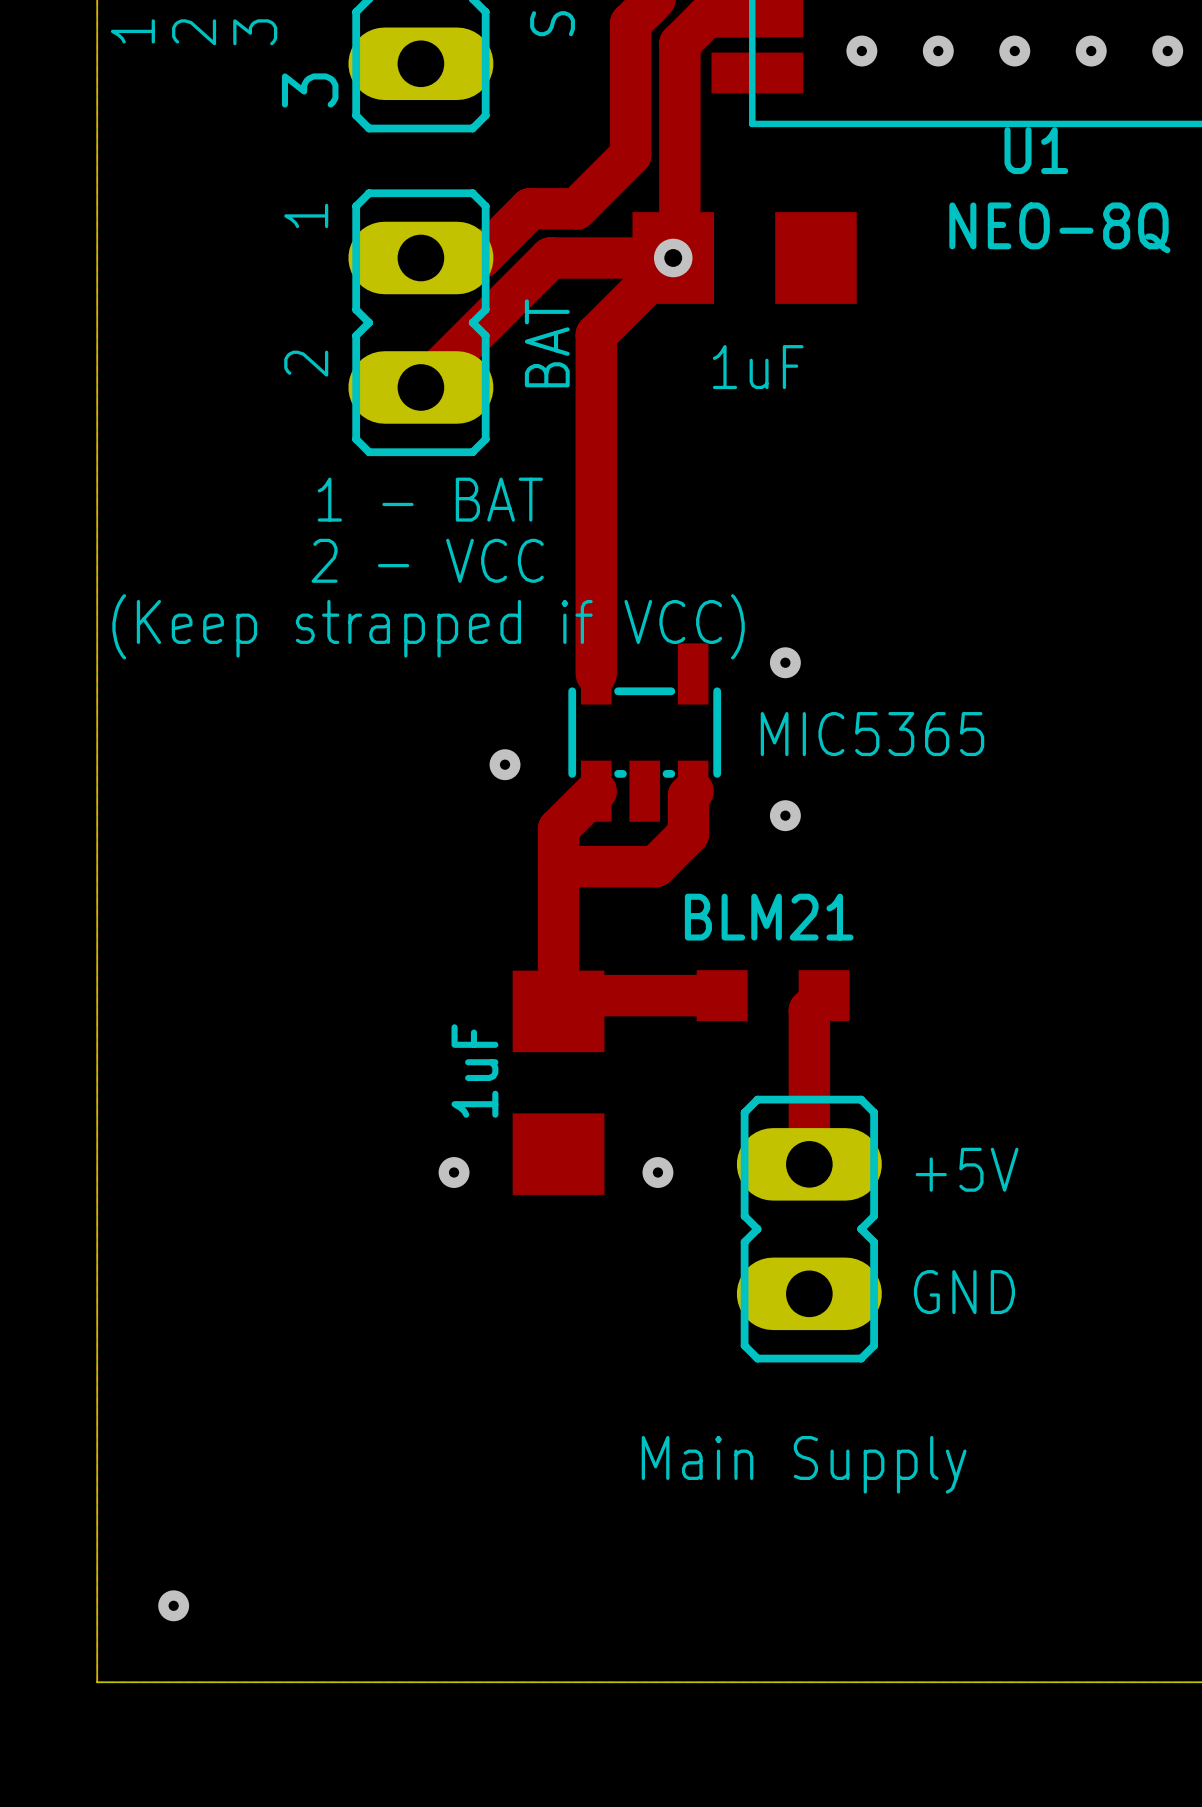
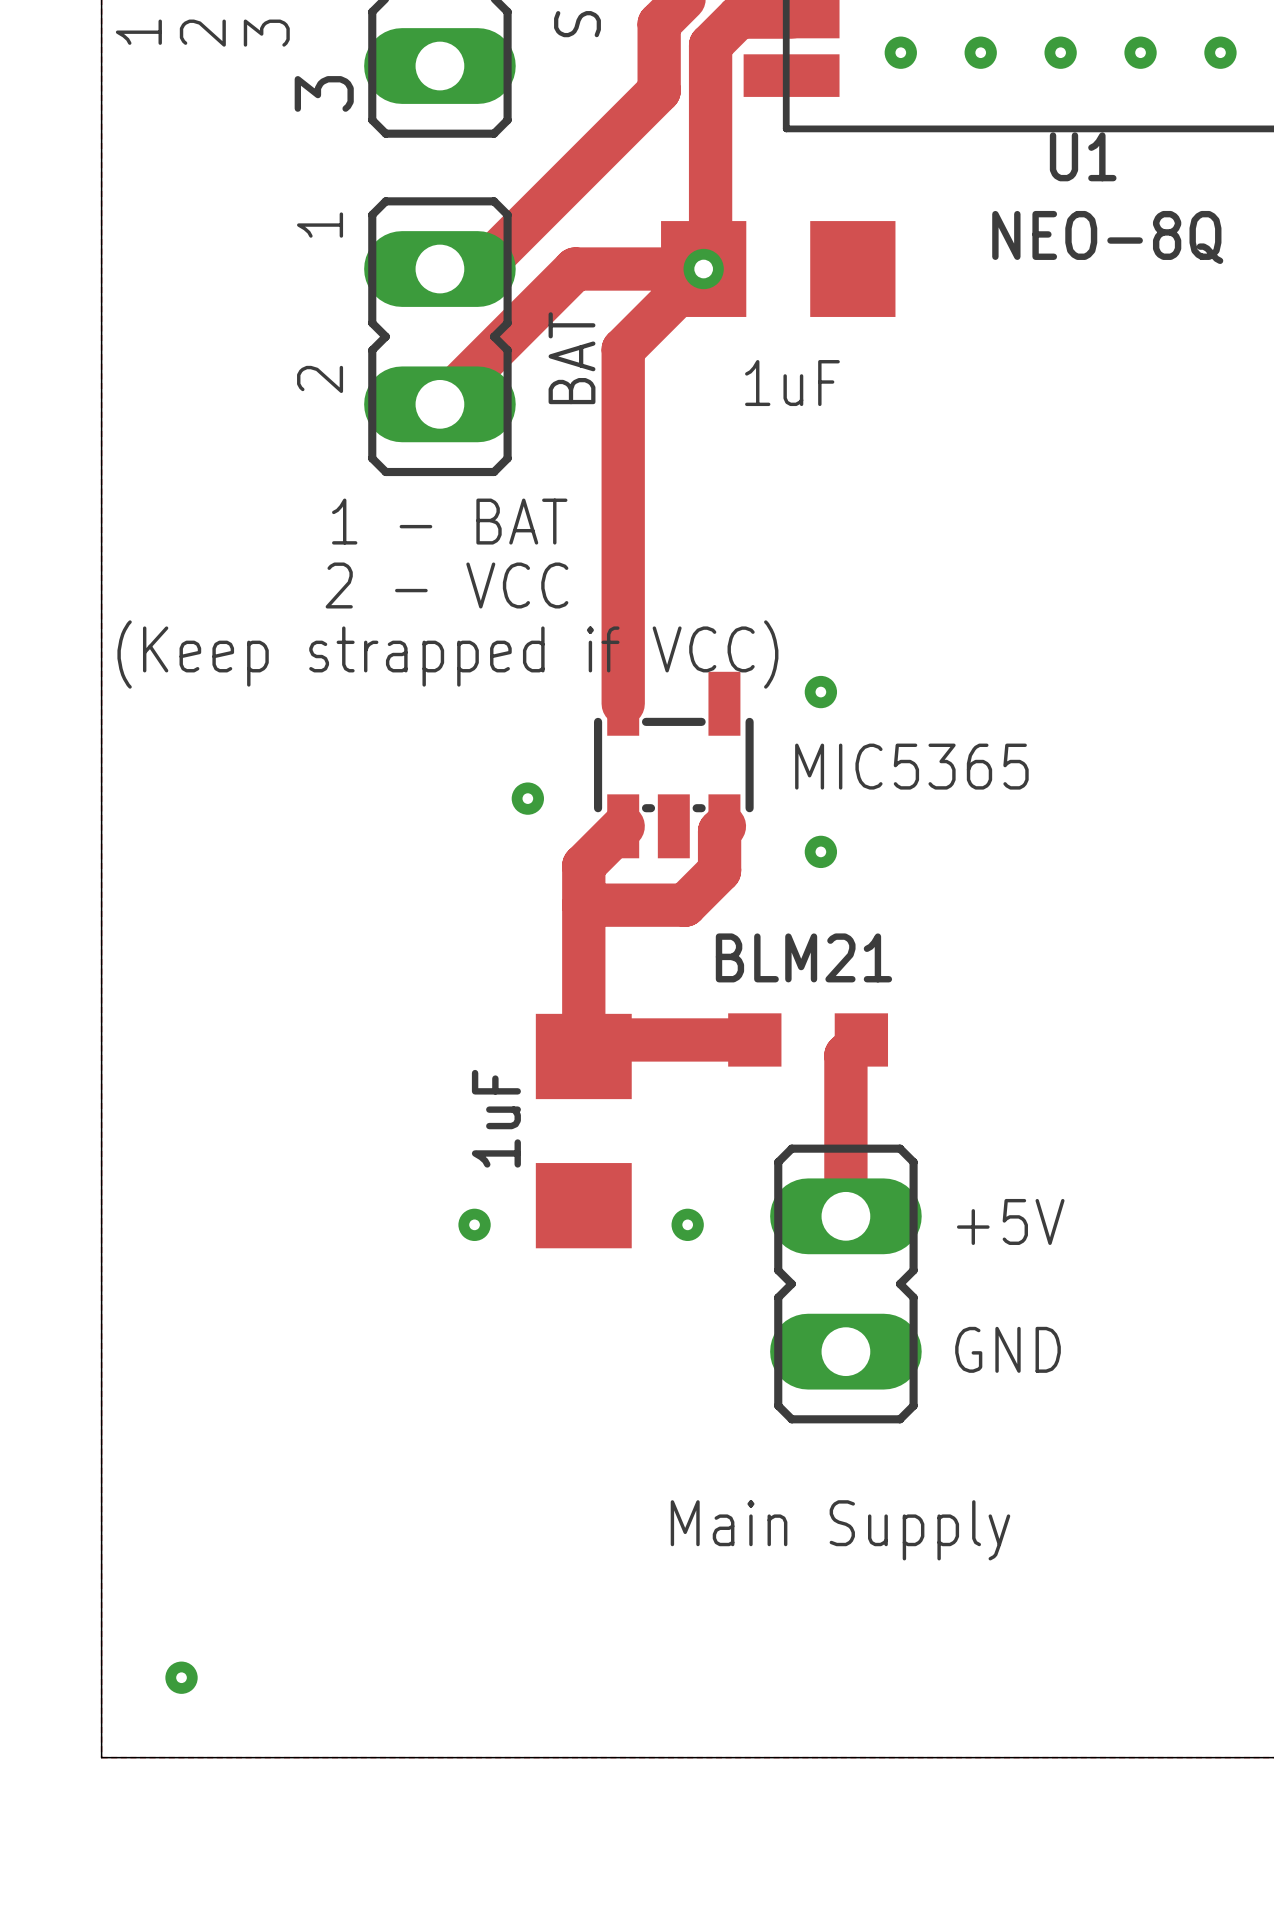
track: (630, 87) (630, 154) (576, 208) (530, 208) (480, 257) (460, 257) -> (659, 90) (480, 269)

